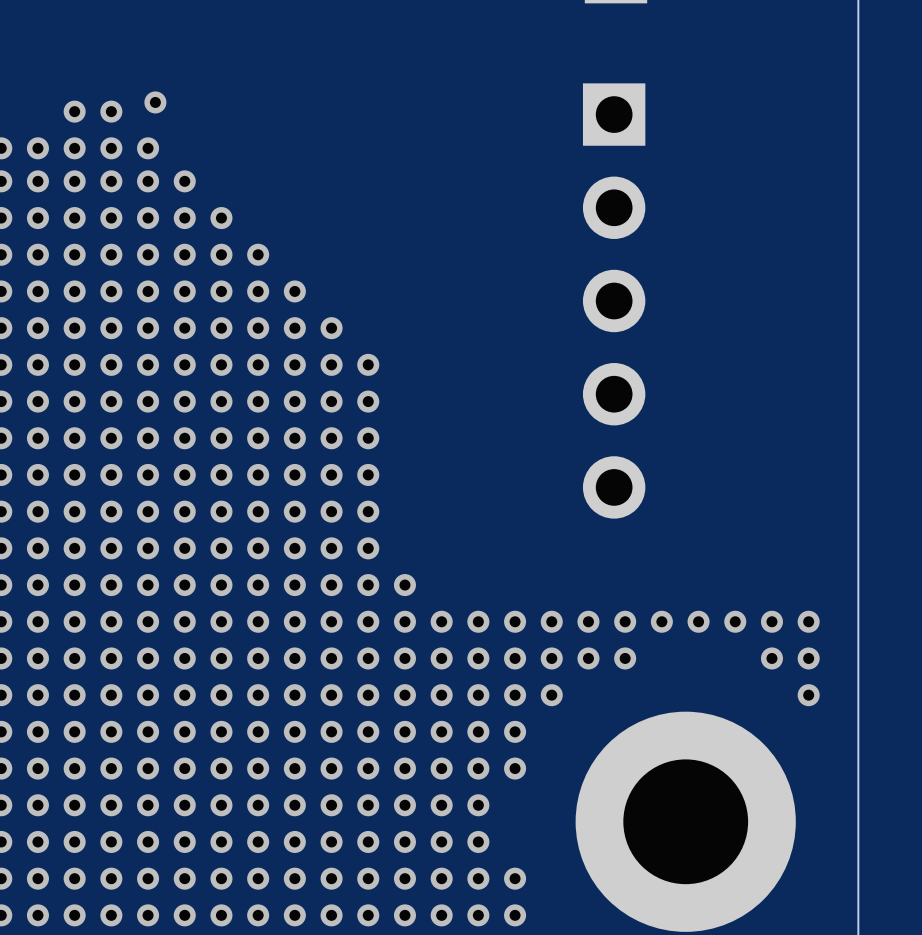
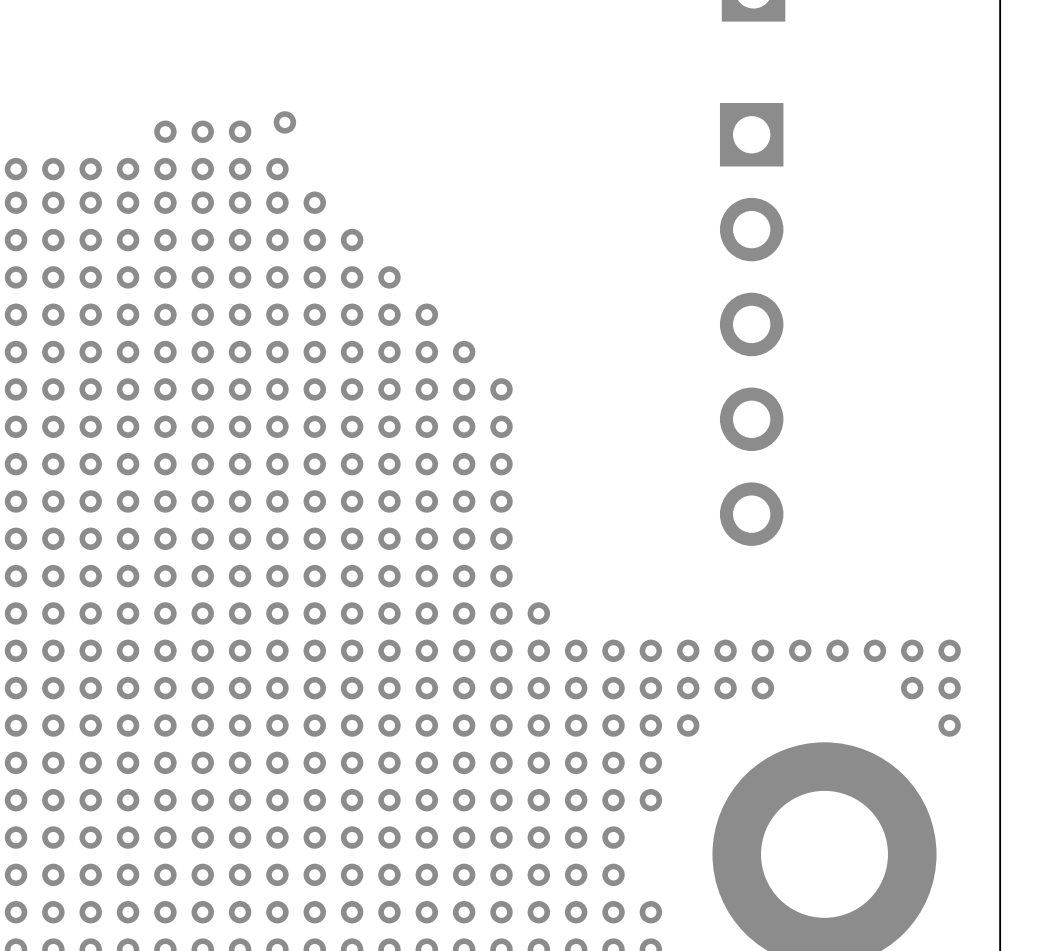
via: none -> (165, 131)

